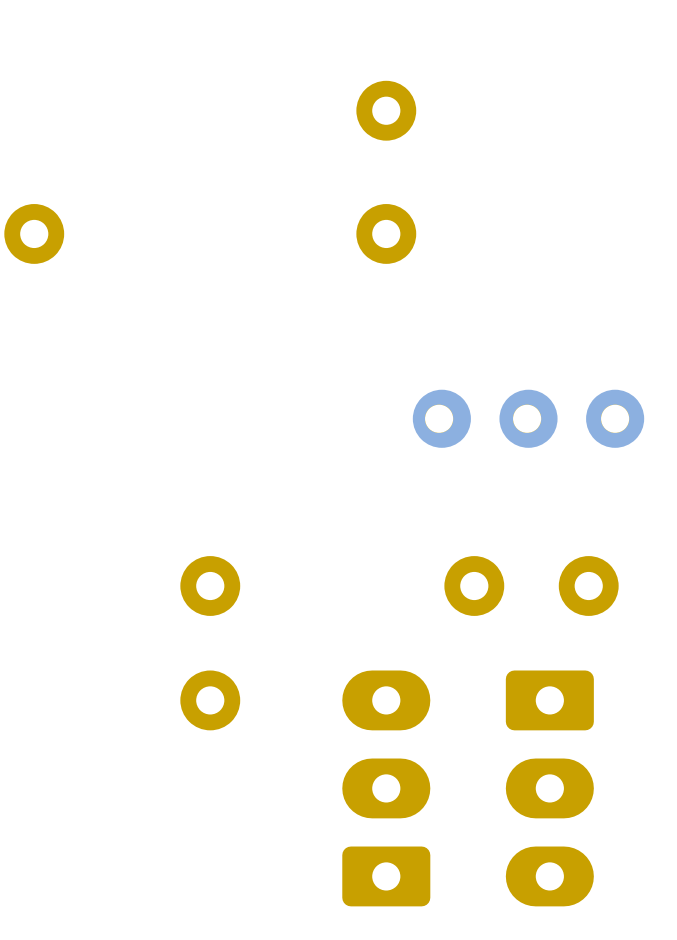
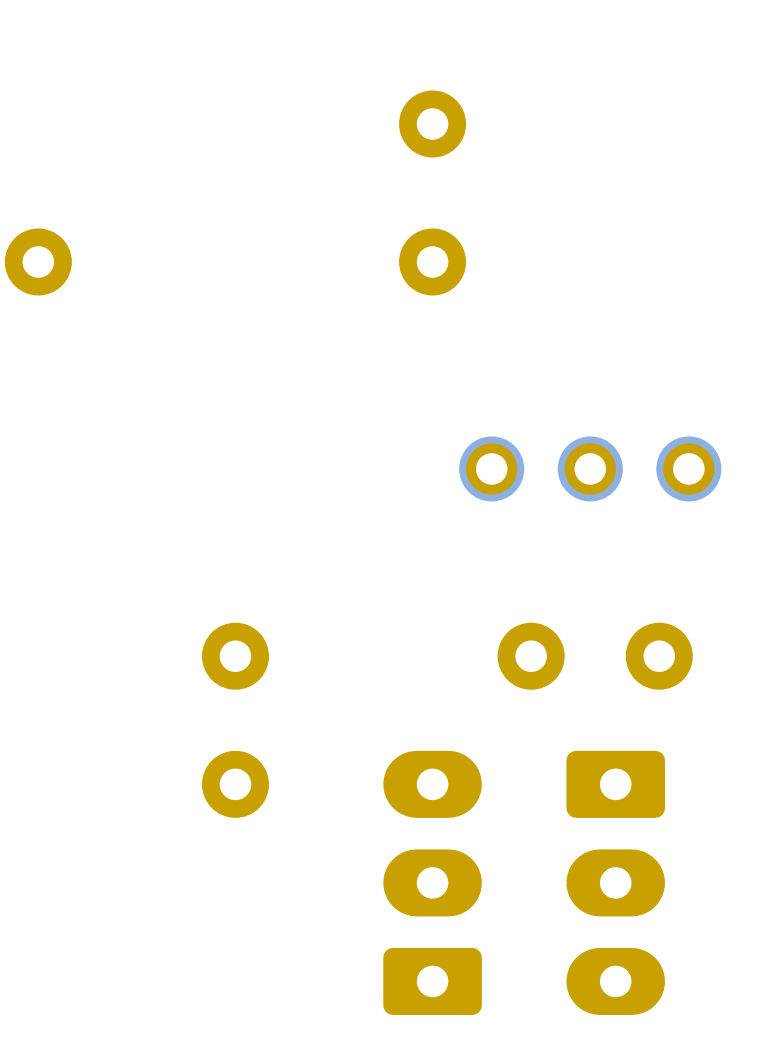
part footprint: [412, 389, 645, 448] -> [459, 436, 722, 502]

